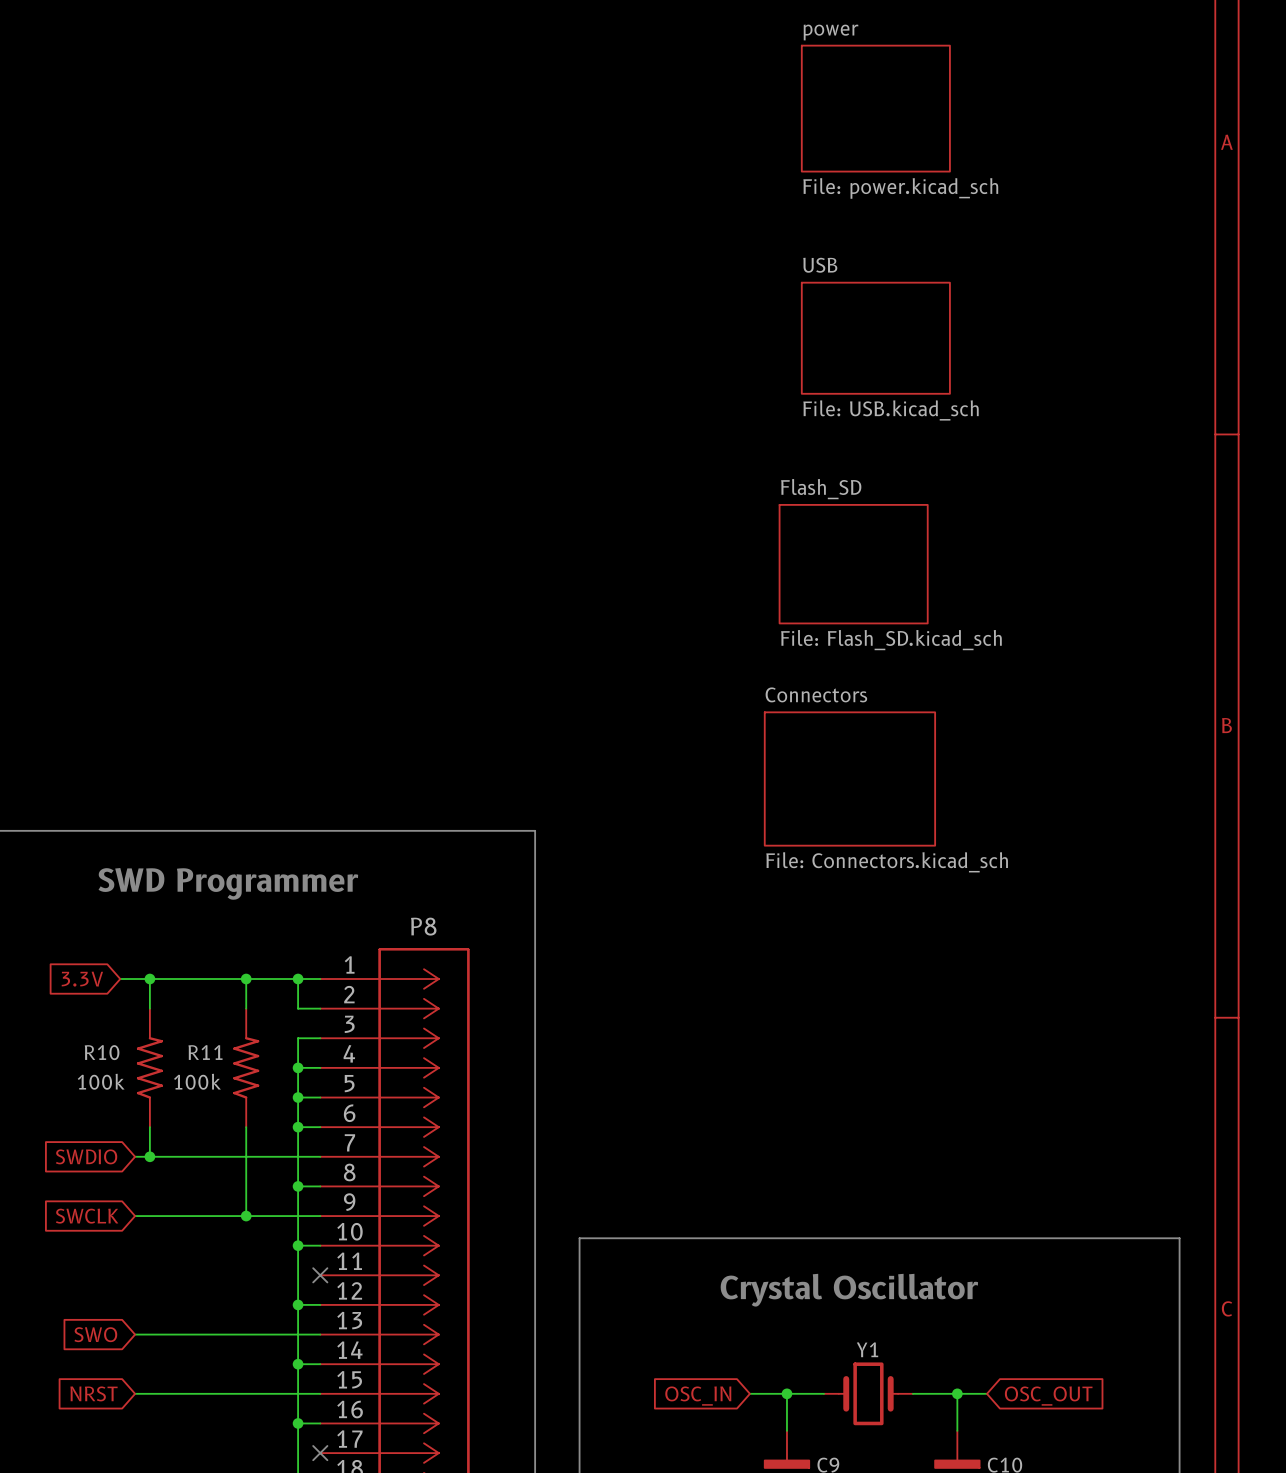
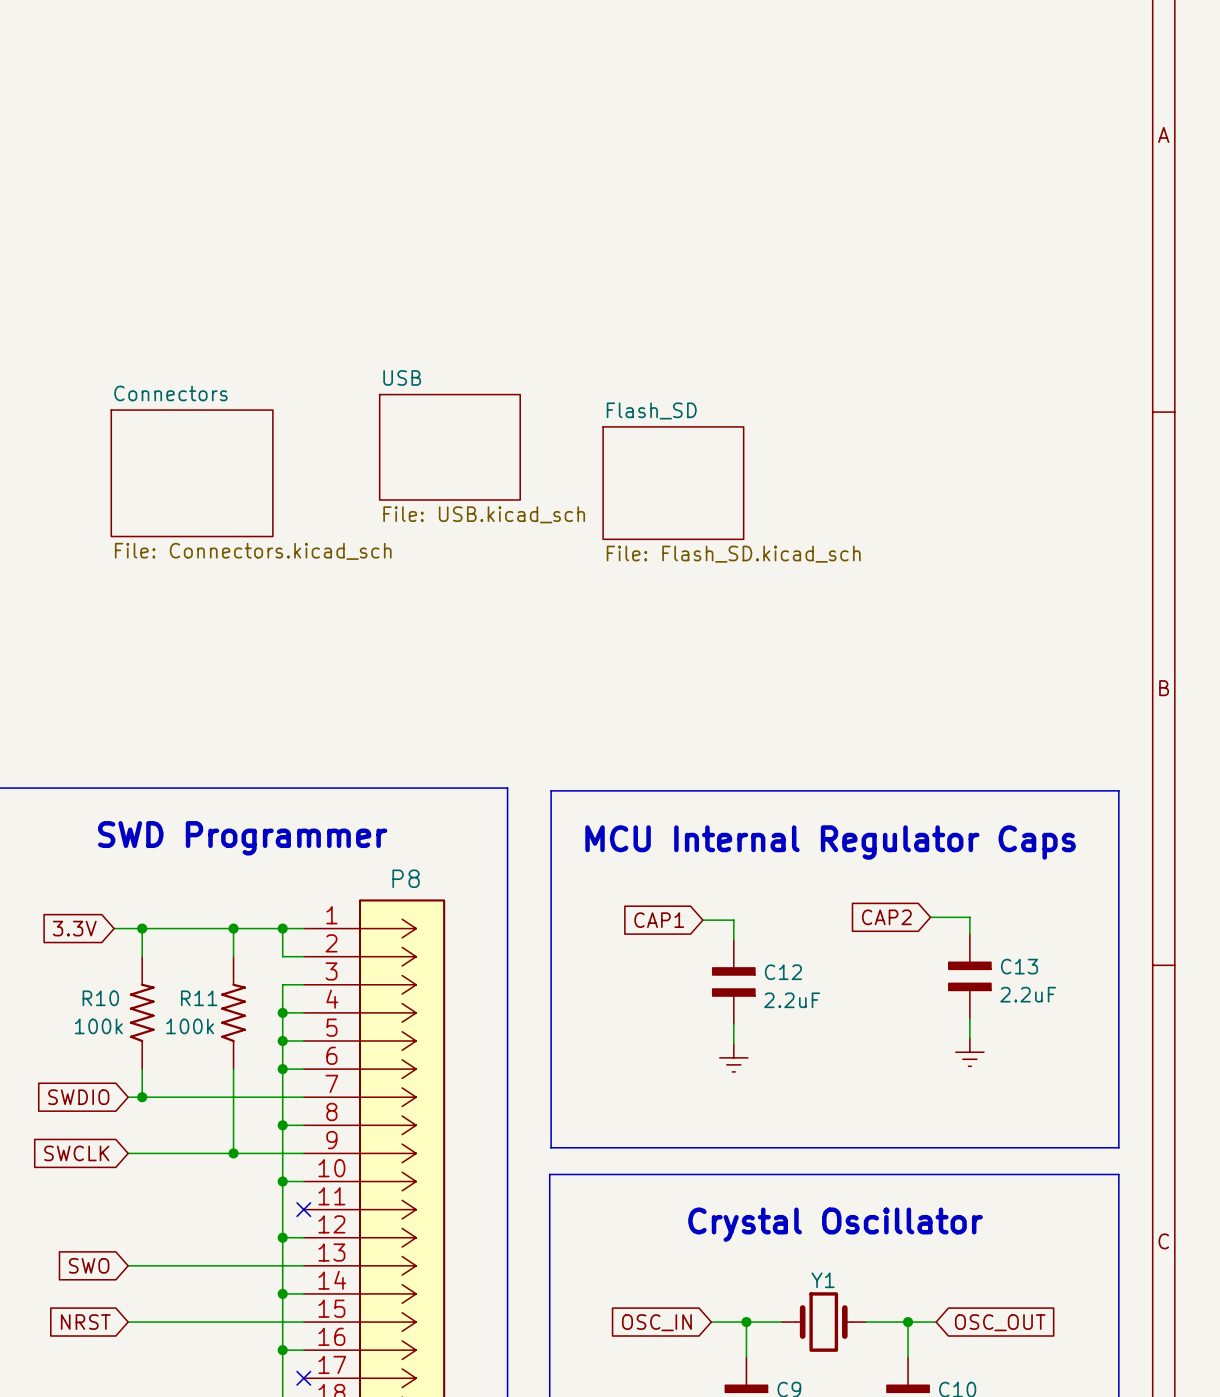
sheet power: File: power.kicad_sch (875, 108) -> none
sheet USB: File: USB.kicad_sch (875, 338) -> none
sheet USB: none -> File: USB.kicad_sch (449, 447)
sheet Connectors: none -> File: Connectors.kicad_sch (192, 473)
sheet Flash_SD position: (853, 564) -> (673, 483)
sheet Connectors: File: Connectors.kicad_sch (849, 778) -> none
line: none -> (551, 790) (551, 1147) (1118, 1147) (1118, 790) (551, 790)
text: none -> MCU Internal Regulator Caps (830, 842)
global label: none -> CAP2 (886, 917)
wire: none -> (930, 917) (969, 917) (969, 934)
global label: none -> CAP1 (659, 920)
wire: none -> (702, 920) (733, 920) (733, 939)
C13: none -> 2.2uF (969, 976)
C12: none -> 2.2uF (733, 981)
wire: none -> (969, 1018) (969, 1038)
wire: none -> (733, 1024) (733, 1043)
power symbol: none -> (969, 1052)
power symbol: none -> (733, 1057)

